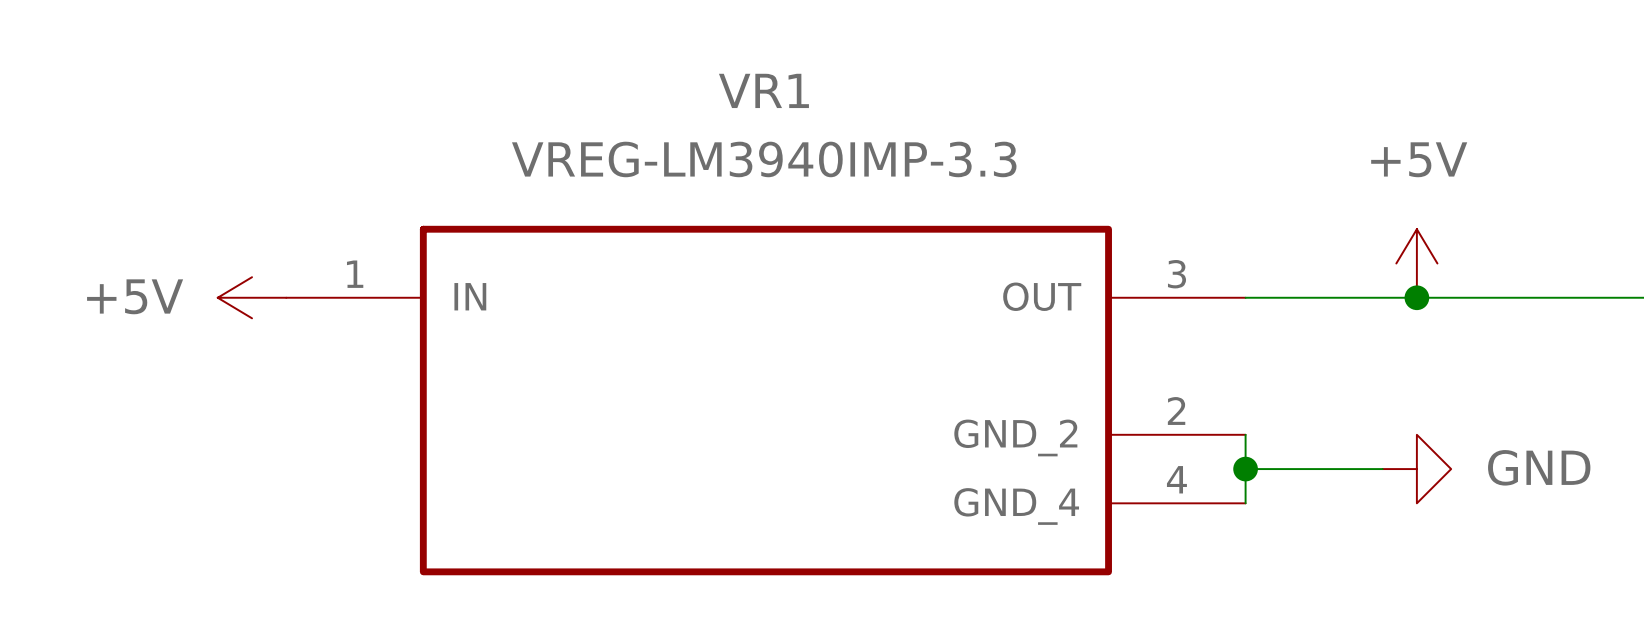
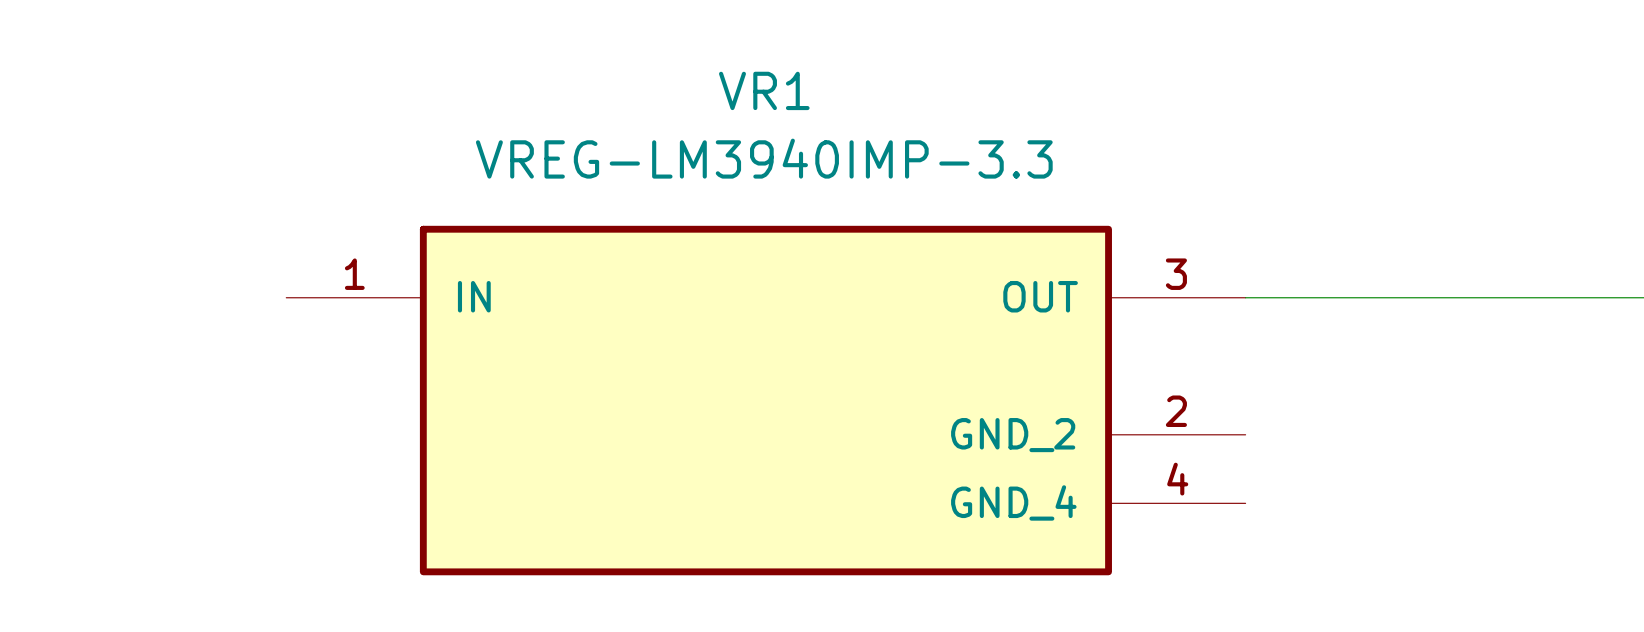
power symbol: +5V (1416, 263) -> none
power symbol: +5V (252, 297) -> none
junction: (1416, 297) -> none
wire: (1245, 434) (1245, 503) -> none
wire: (1245, 469) (1382, 469) -> none
junction: (1245, 469) -> none
power symbol: GND (1416, 469) -> none

